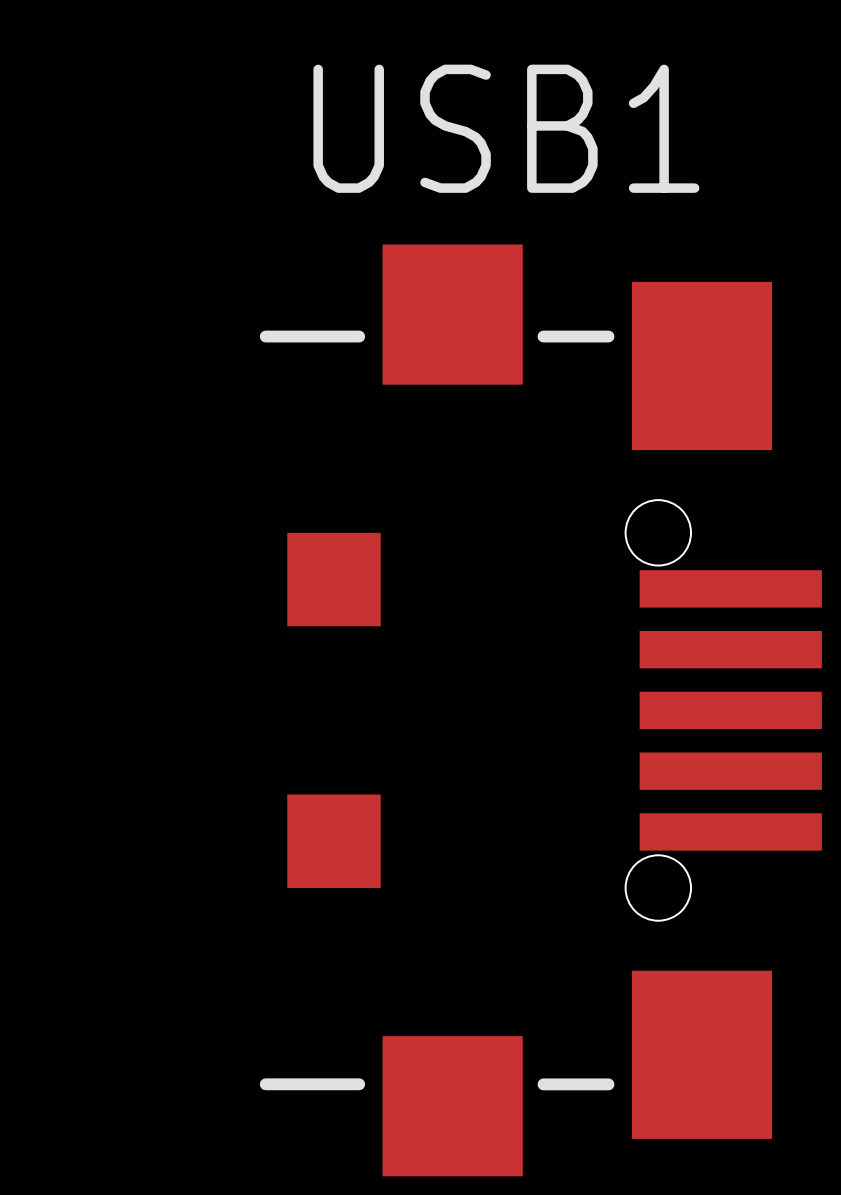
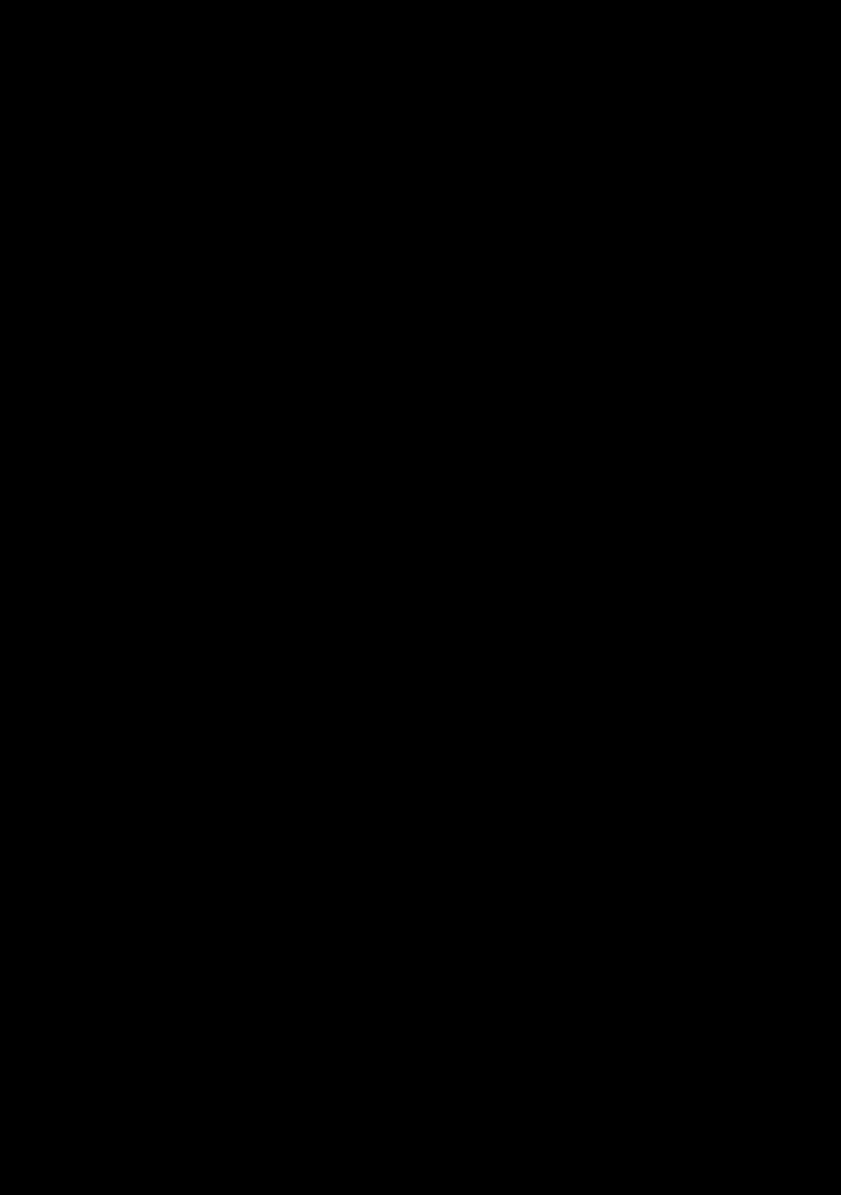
USB1: (540, 710) -> none

